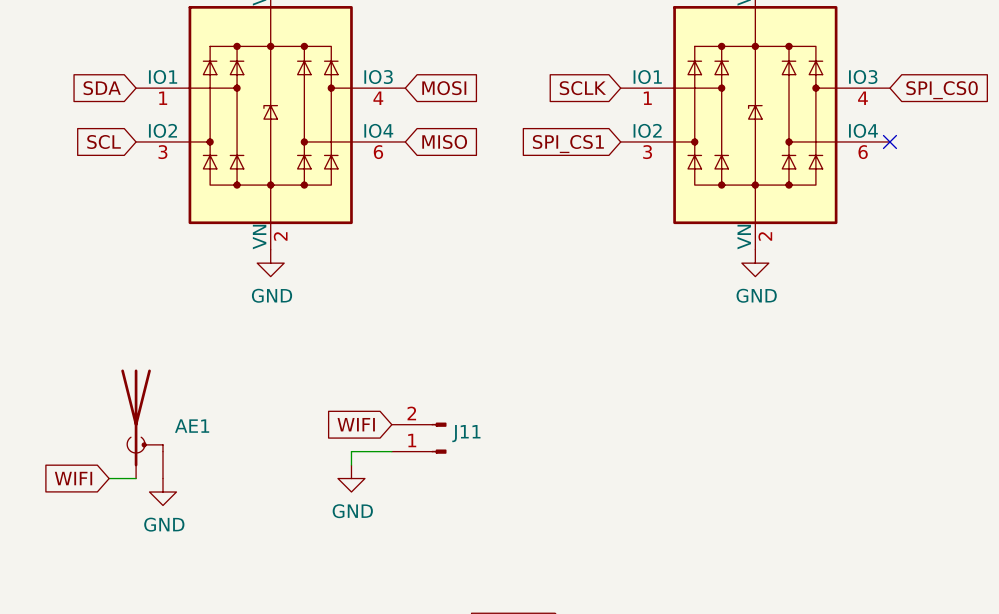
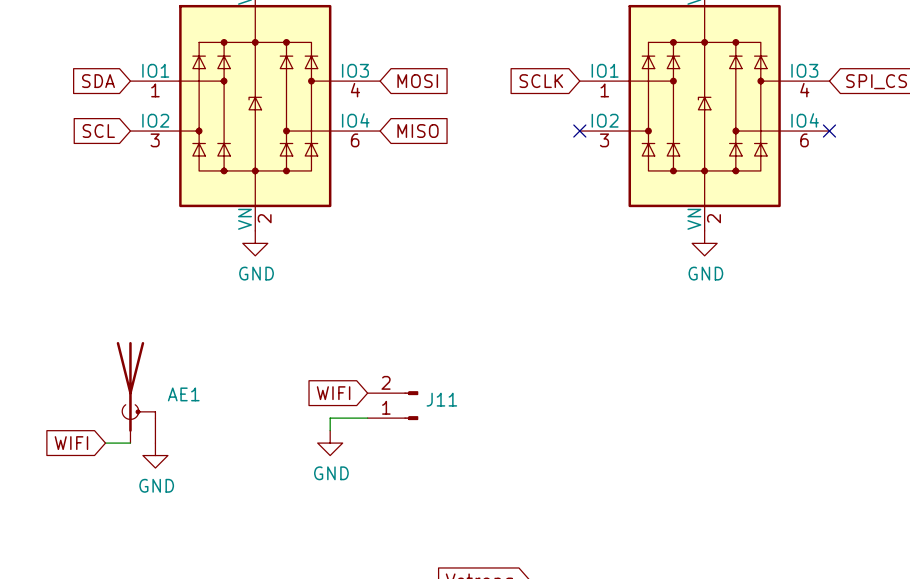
no-connect mark: none -> (579, 131)
global label: SPI_CS1 (568, 144) -> none

